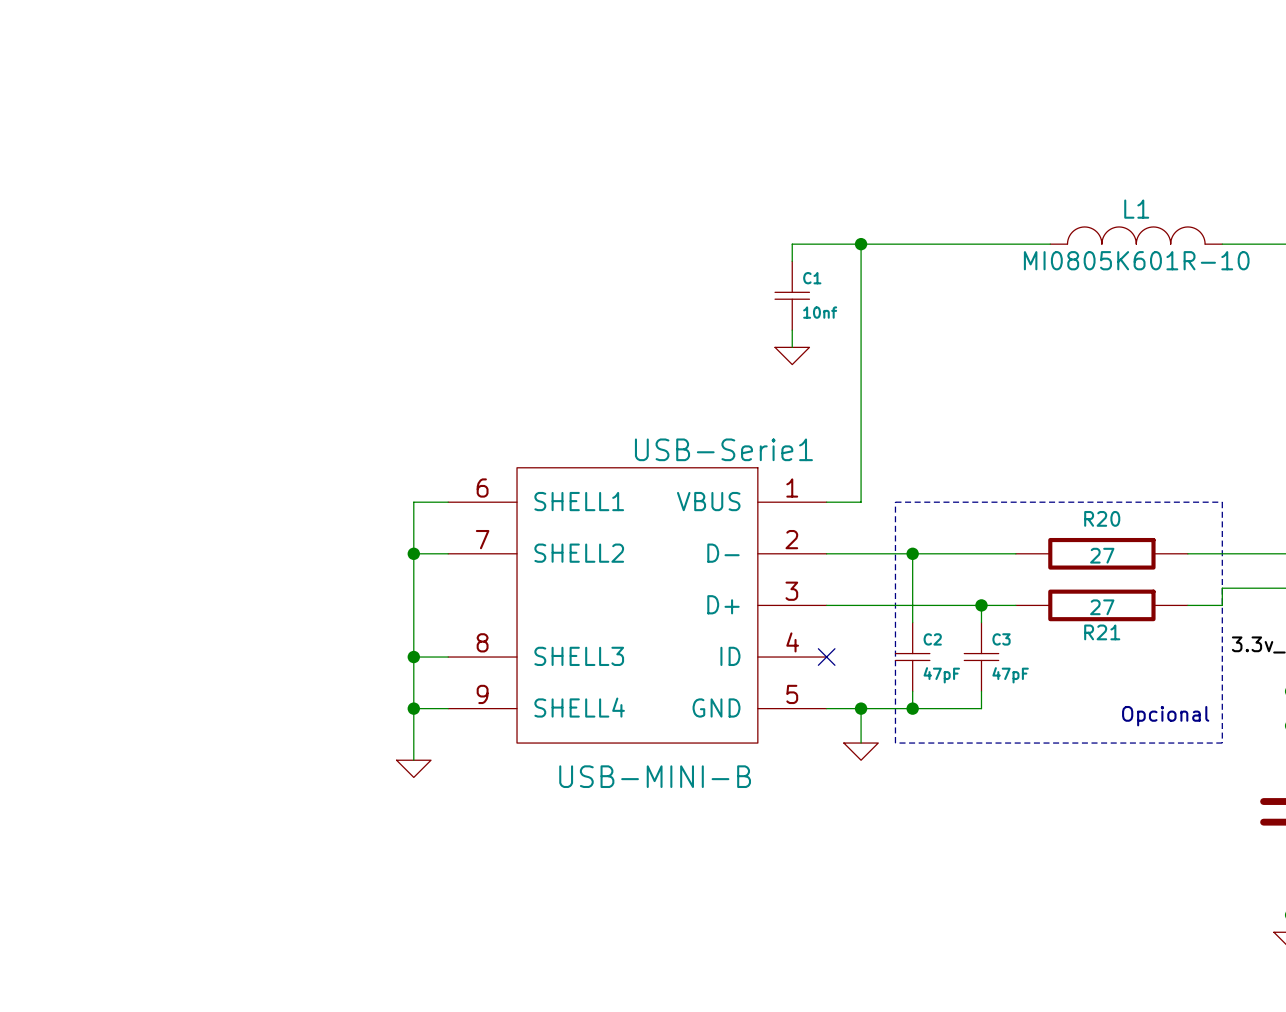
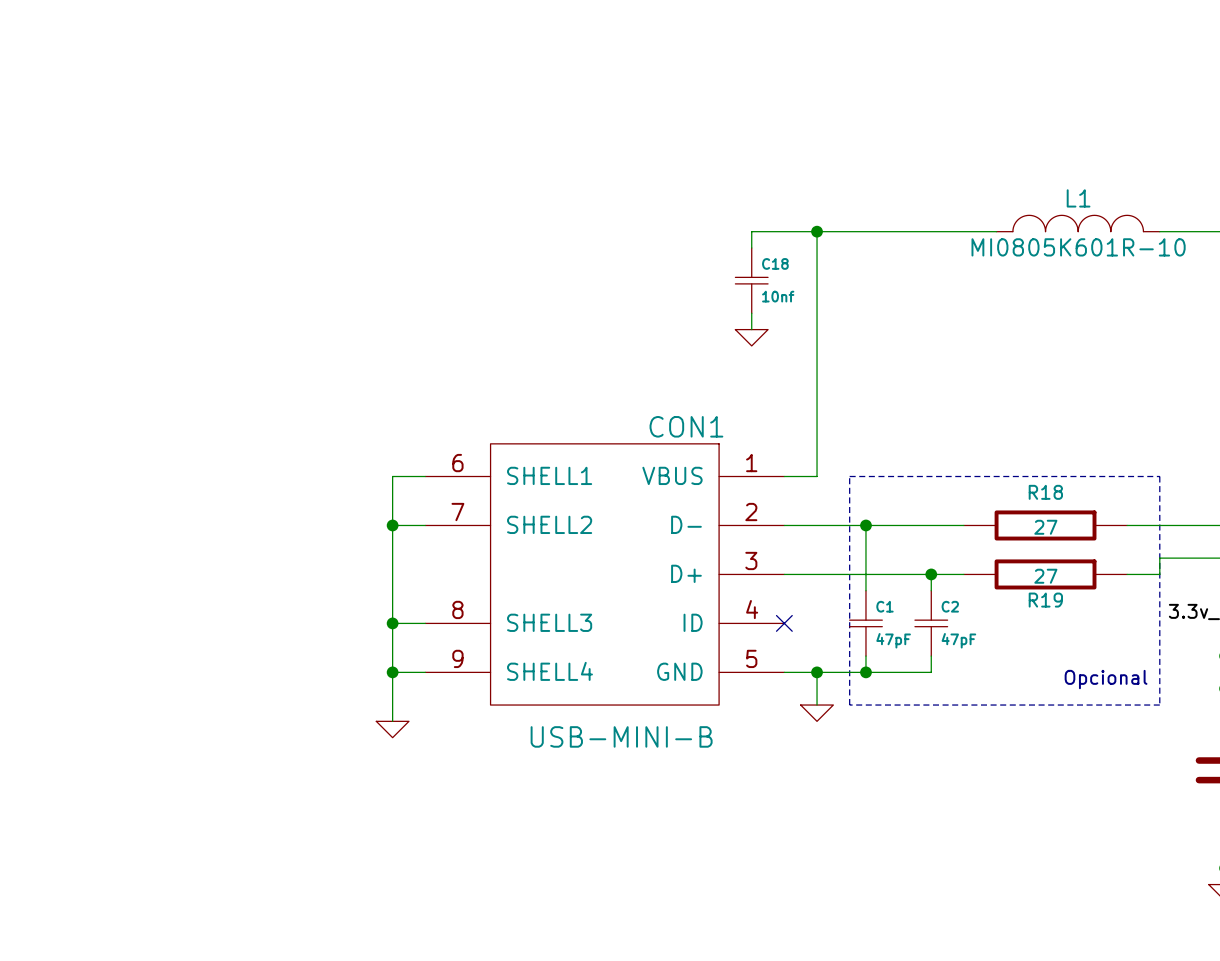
C1 name: C1 (812, 278) -> C18 (775, 263)
USB-Serie1 name: USB-Serie1 (723, 449) -> CON1 (686, 426)
R20 name: R20 (1102, 518) -> R18 (1045, 492)
R21 name: R21 (1102, 632) -> R19 (1045, 600)
C2 name: C2 (932, 639) -> C1 (884, 606)
C3 name: C3 (1001, 639) -> C2 (950, 606)

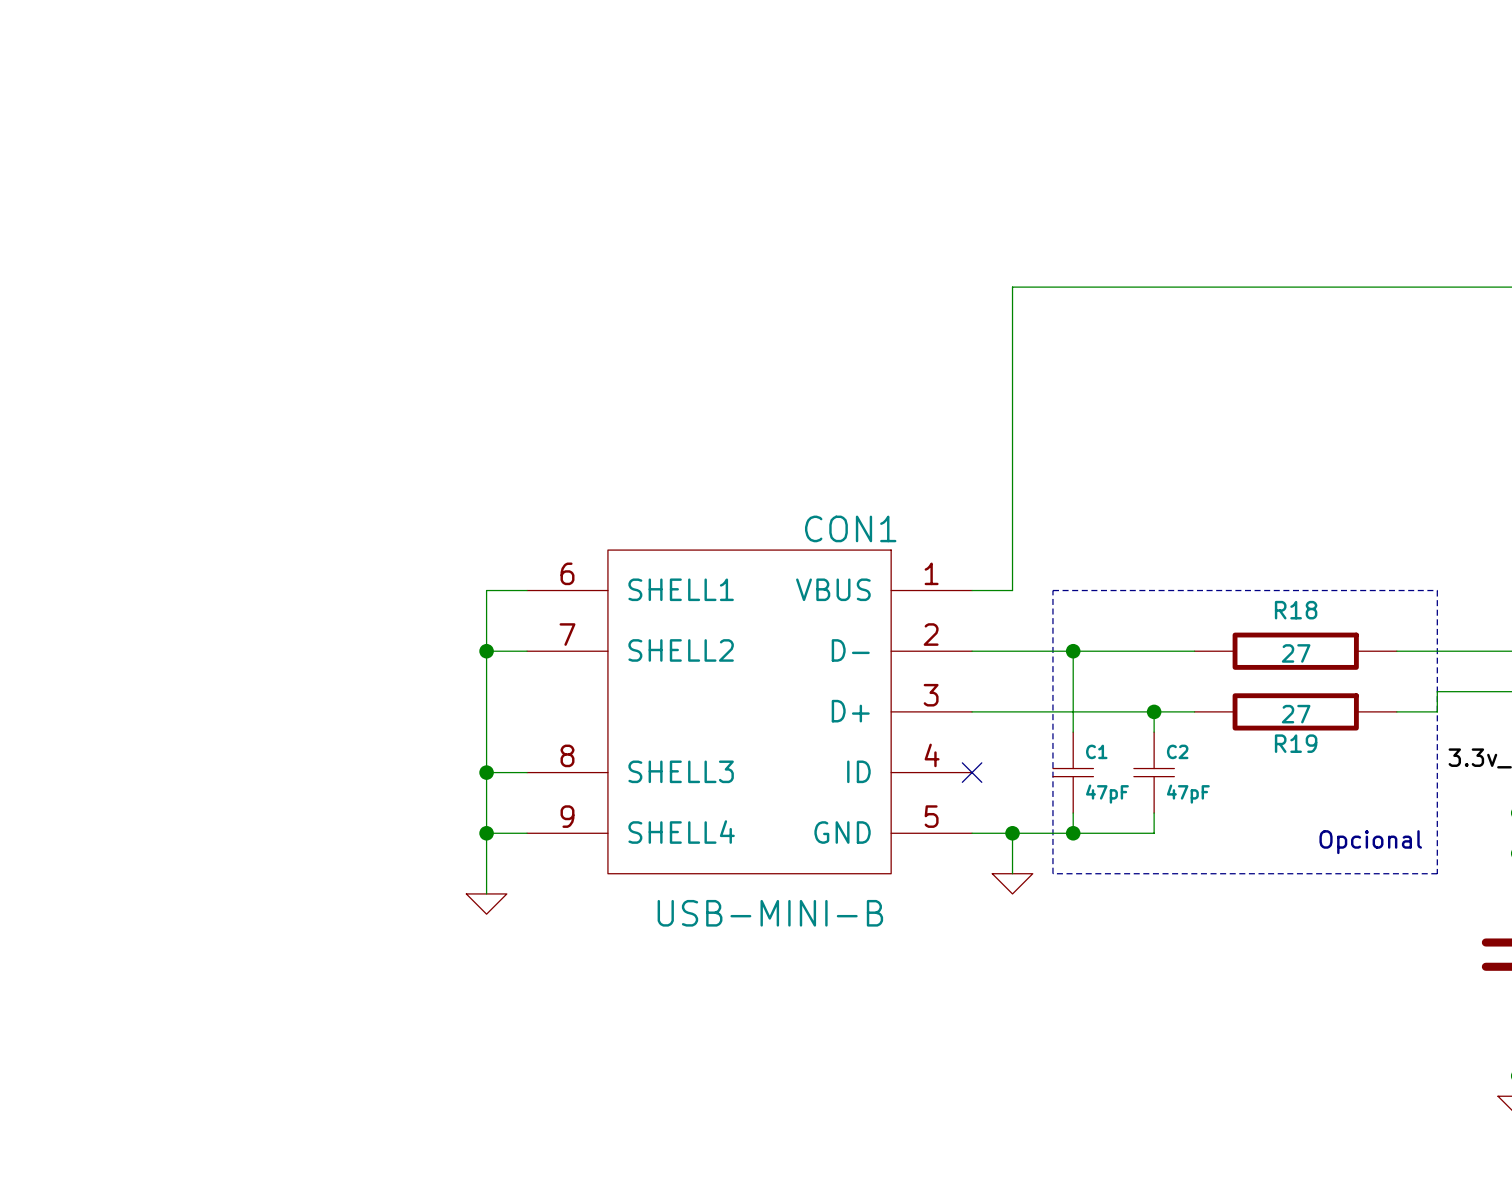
L1: MI0805K601R-10 (1078, 223) -> none
wire: (817, 231) (751, 231) (751, 247) -> none
junction: (817, 231) -> none
wire: none -> (1235, 287) (1437, 287)
C18: 10nf (751, 280) -> none
wire: (751, 313) (751, 329) -> none
power symbol: (751, 337) -> none

